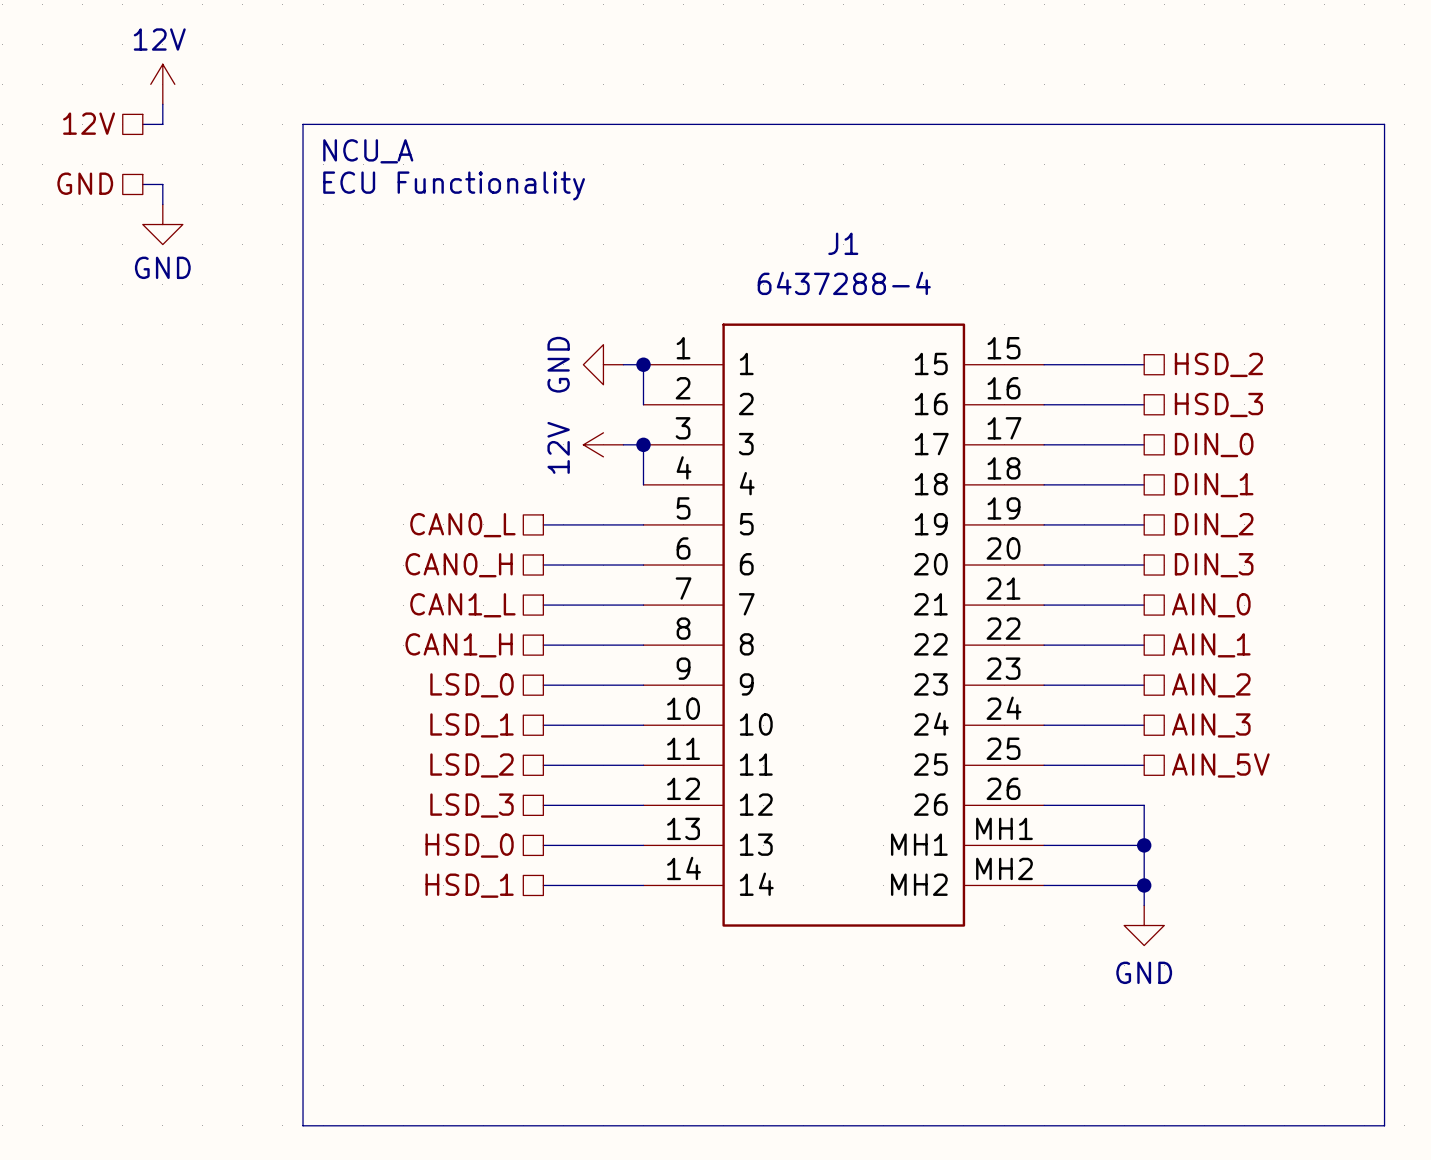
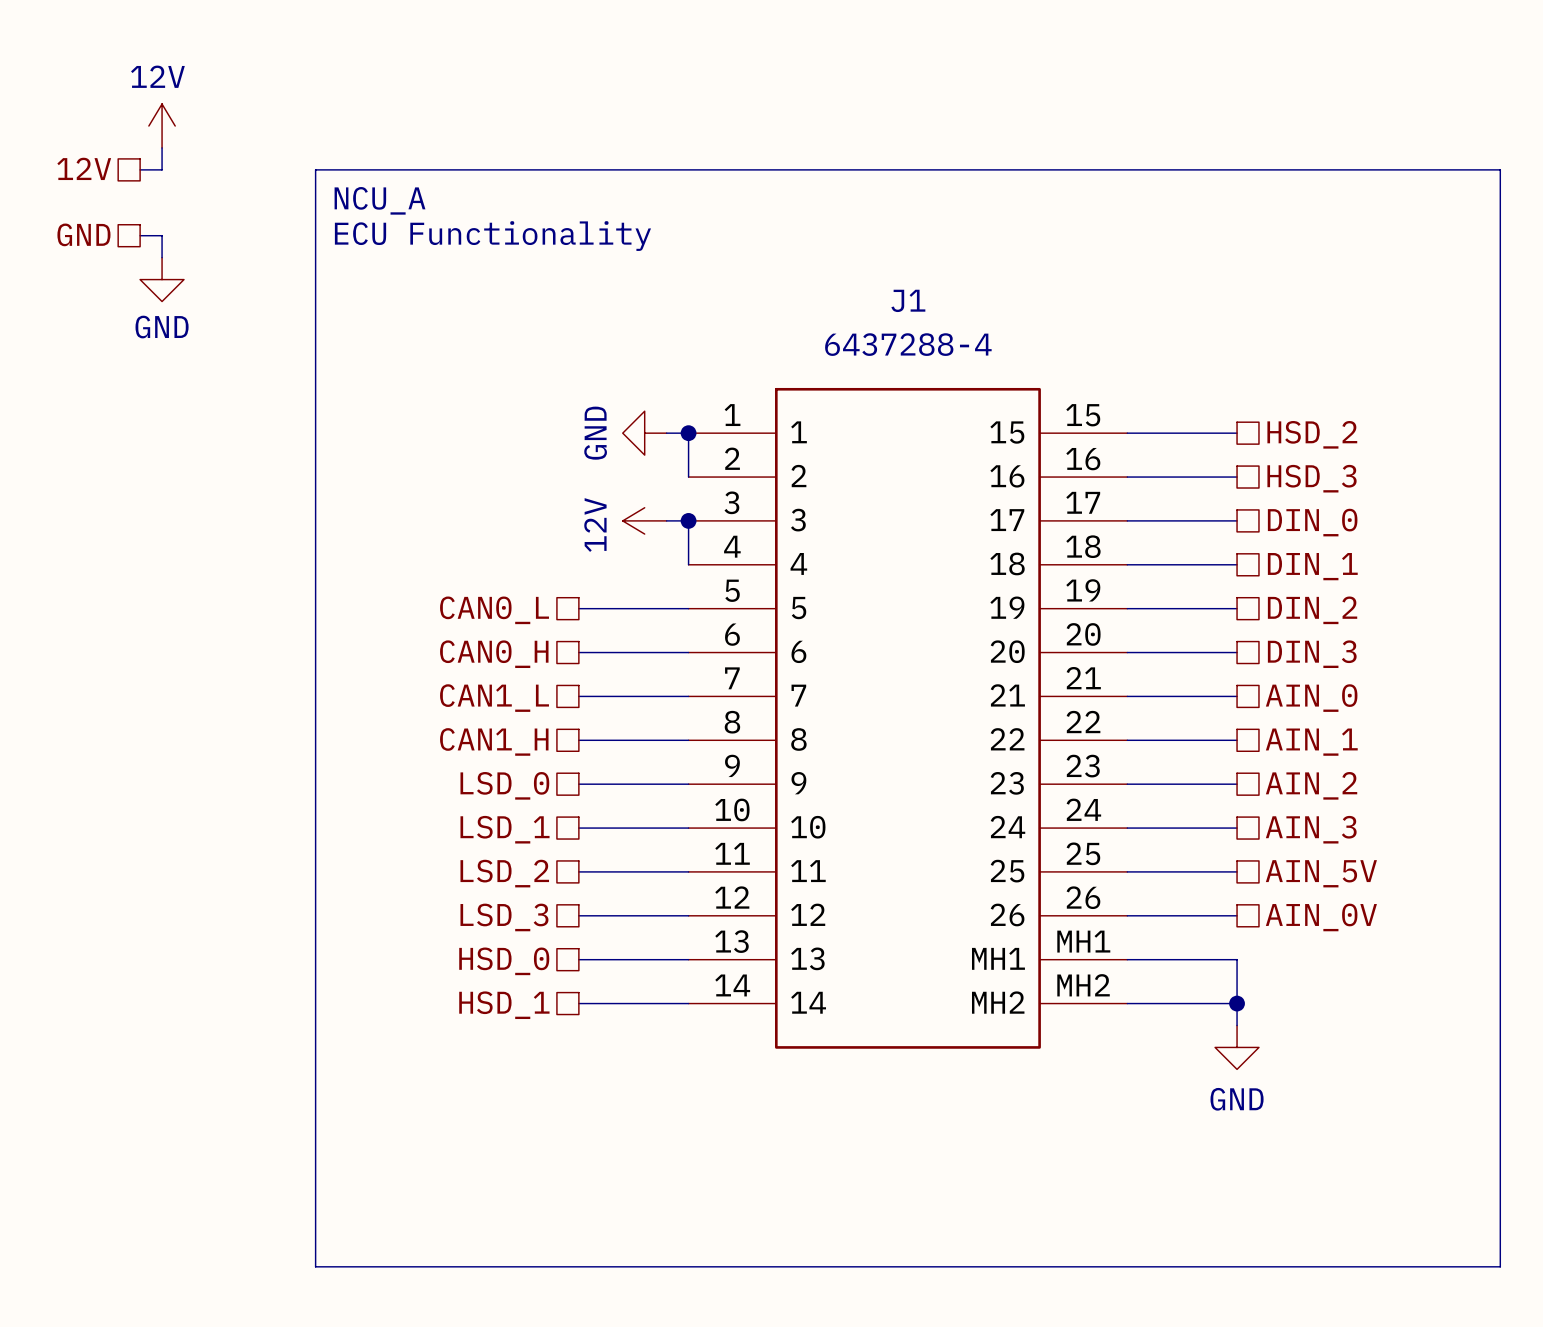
wire: (1144, 805) (1144, 845) -> none
hierarchical label: none -> AIN_0V (1321, 917)
junction: (1144, 845) -> none

